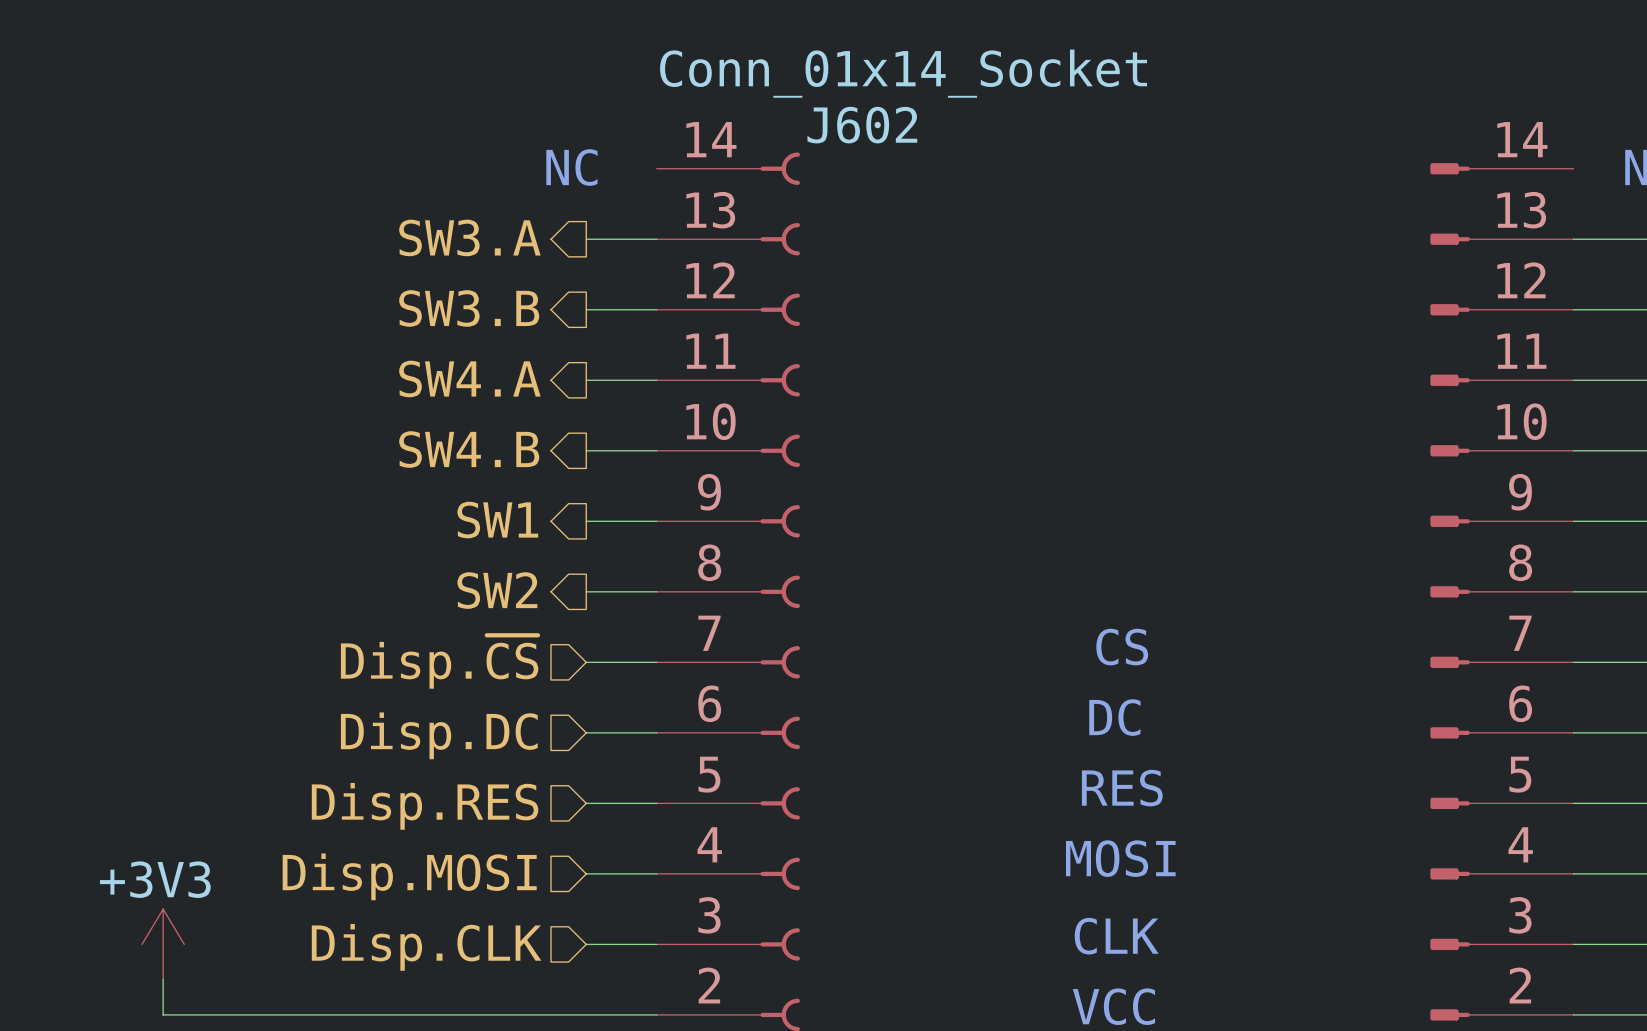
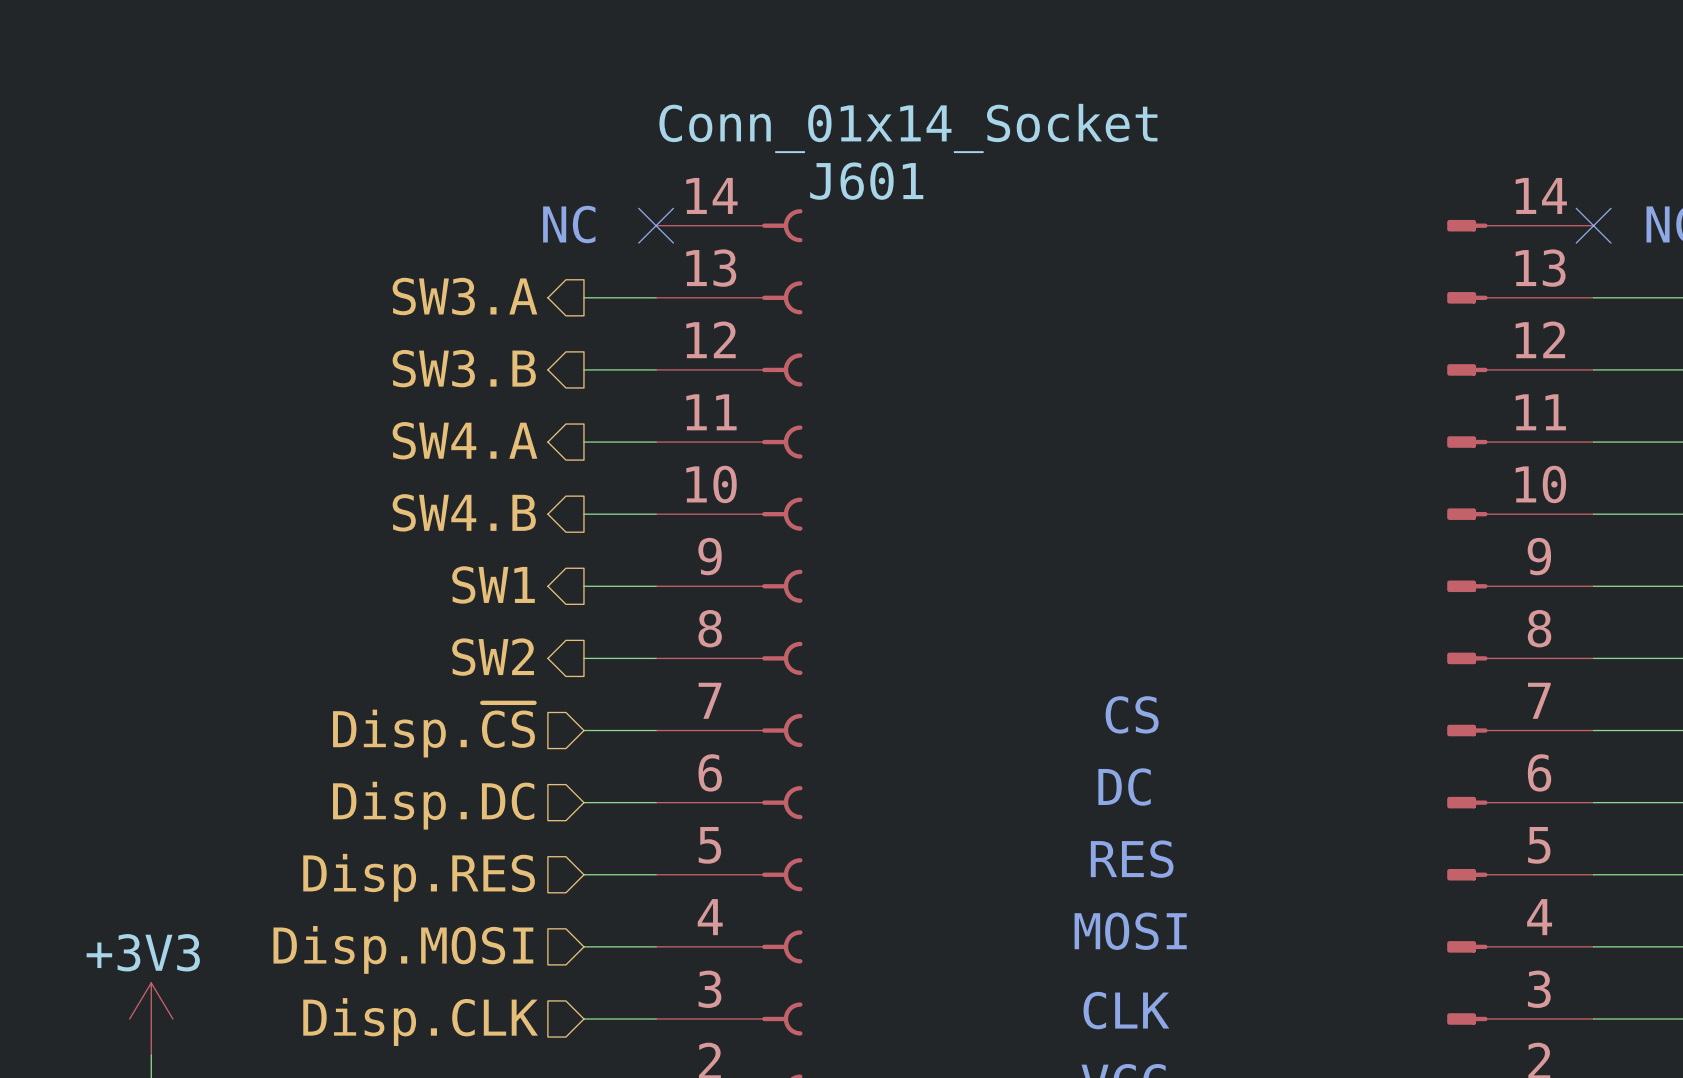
J602 name: J602 (862, 125) -> J601 (866, 181)
no-connect mark: none -> (656, 225)
no-connect mark: none -> (1593, 225)

